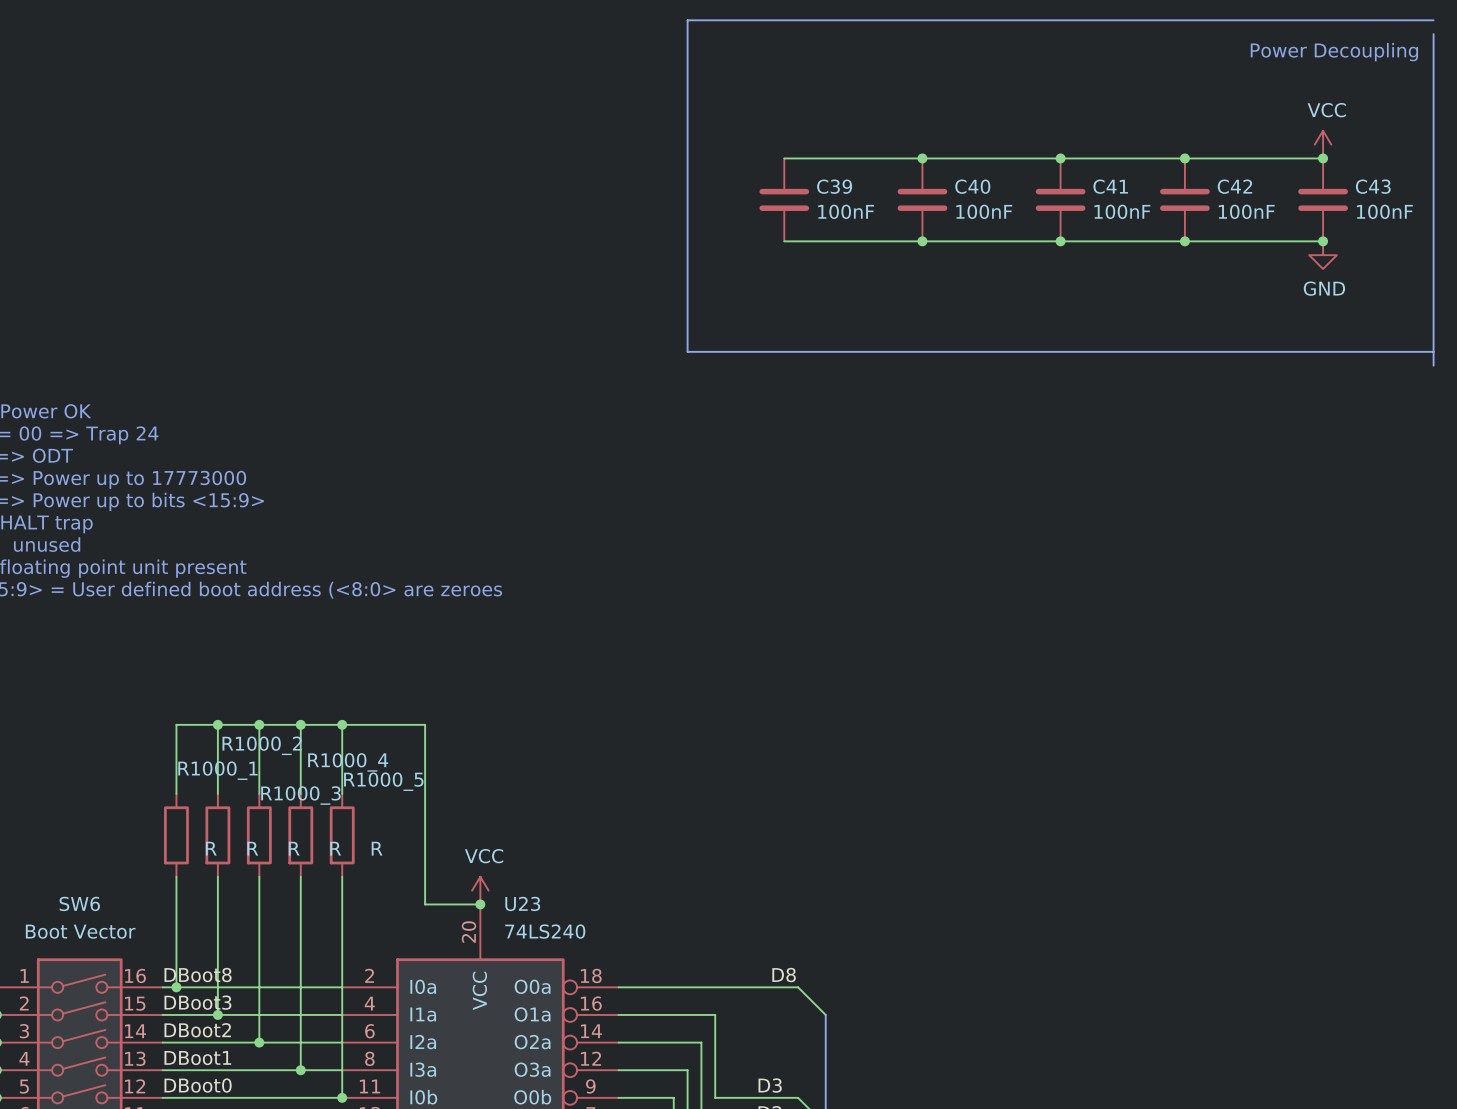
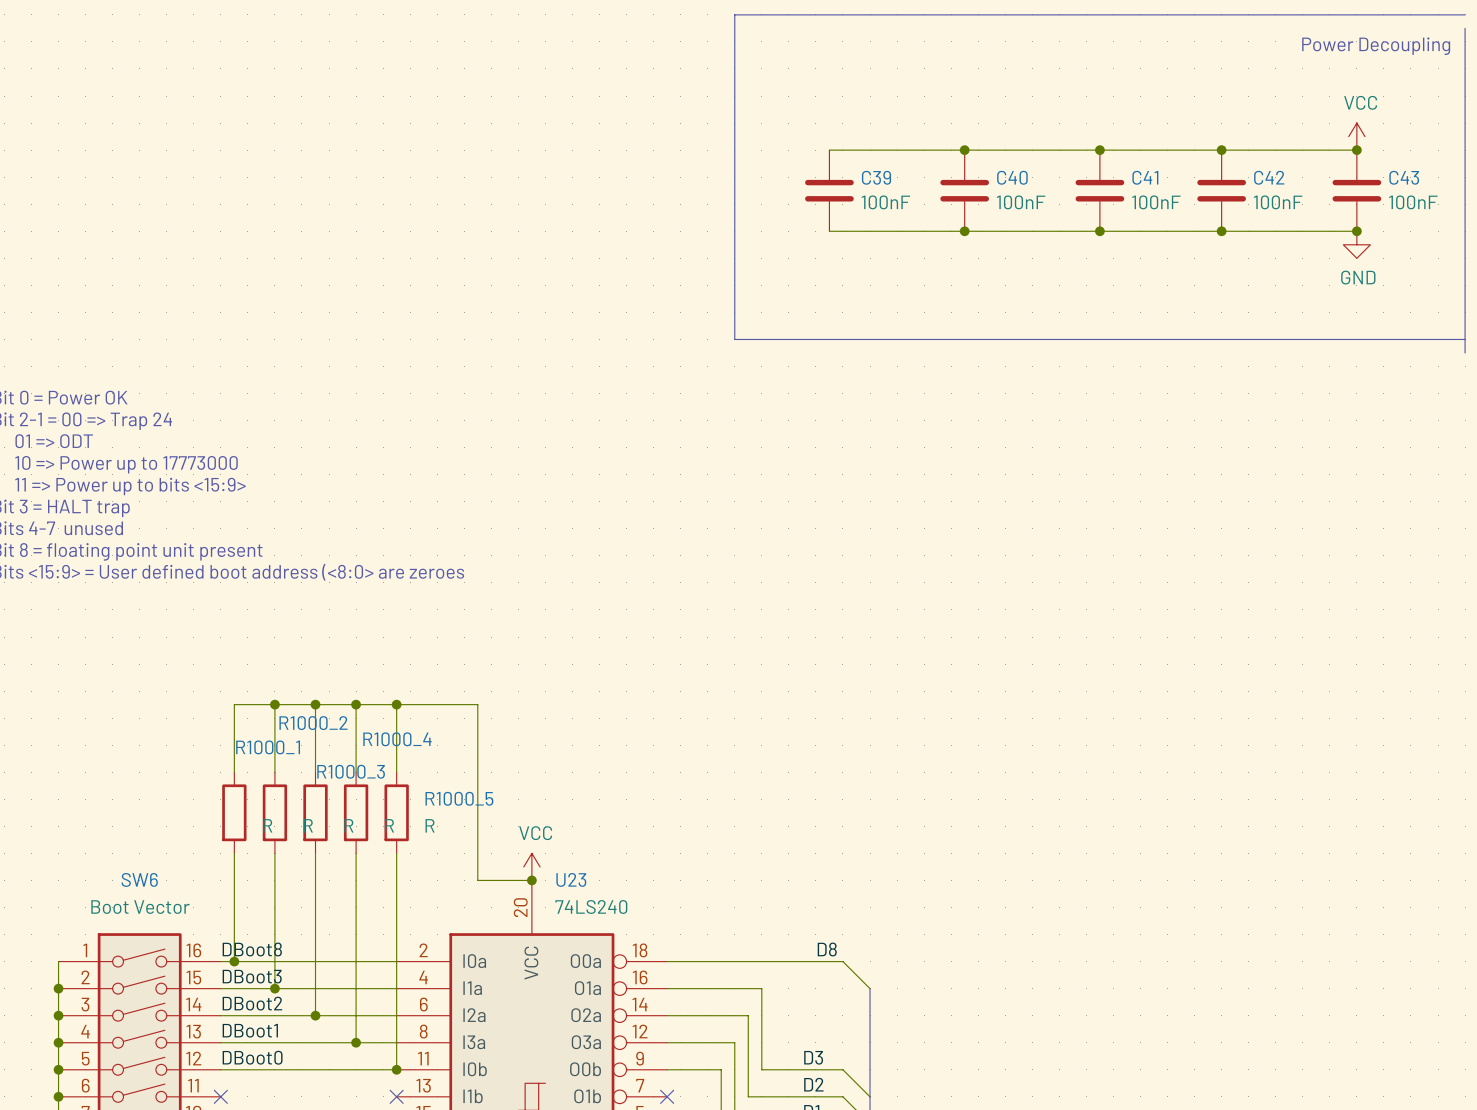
R1000_5 name position: R1000_5 (383, 781) -> R1000_5 (459, 798)

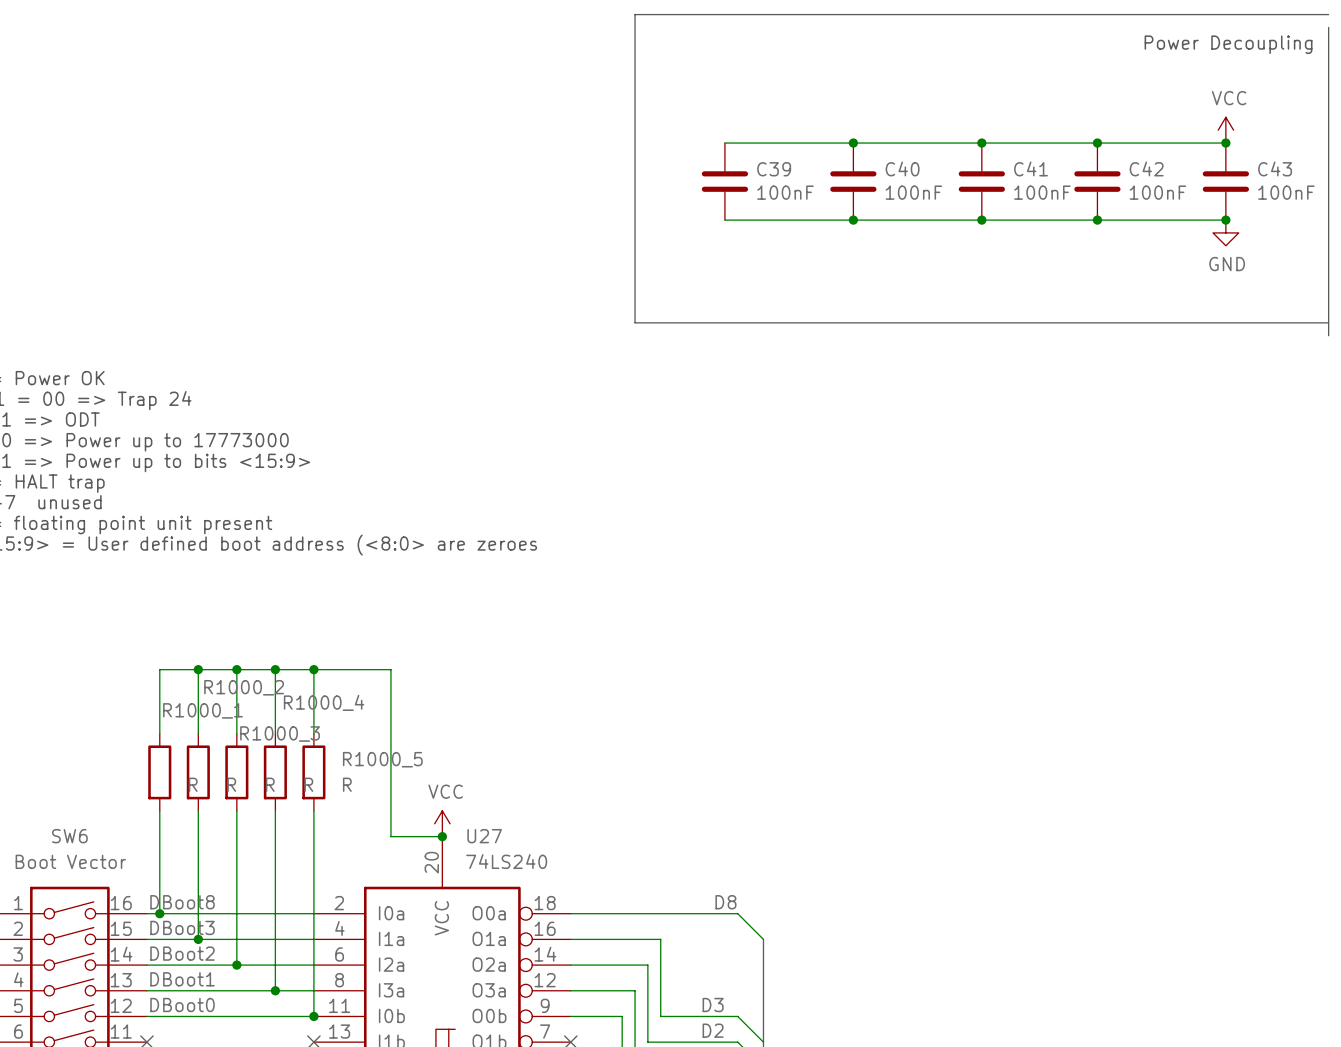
U23 name: U23 (571, 879) -> U27 (484, 836)

